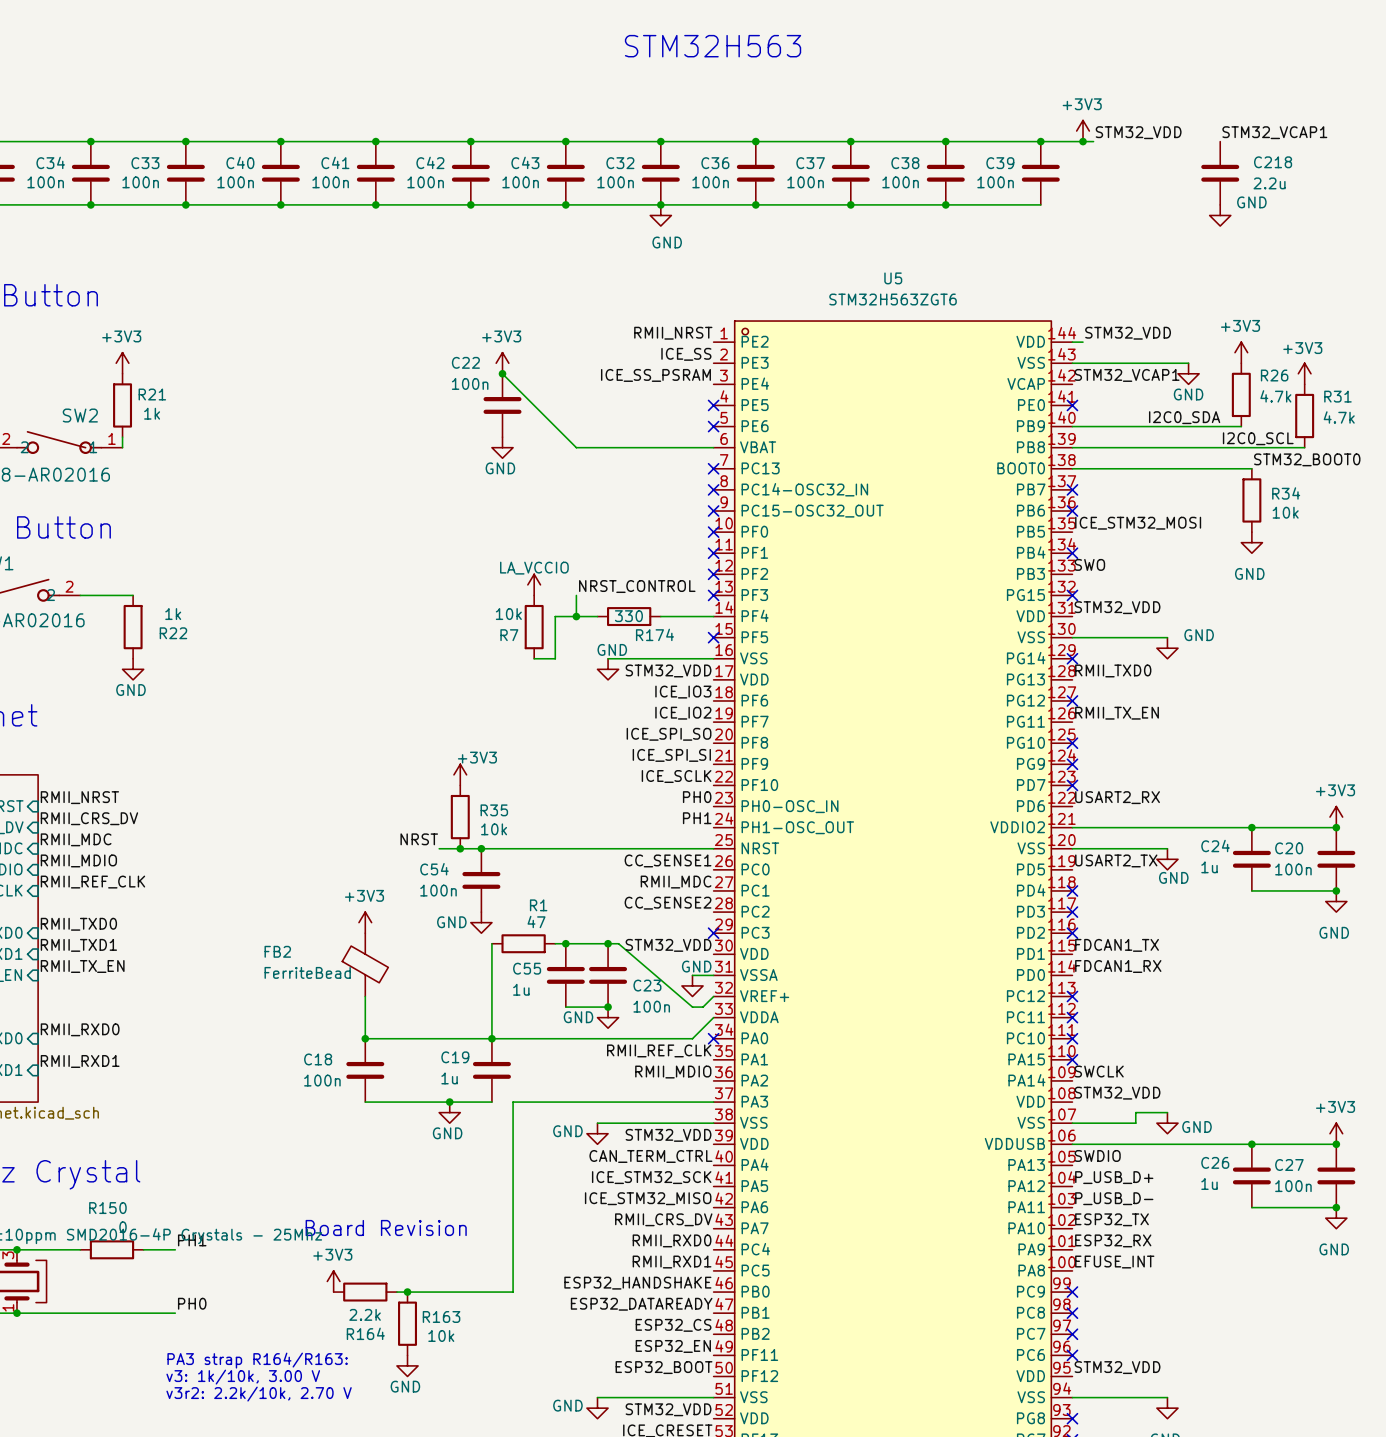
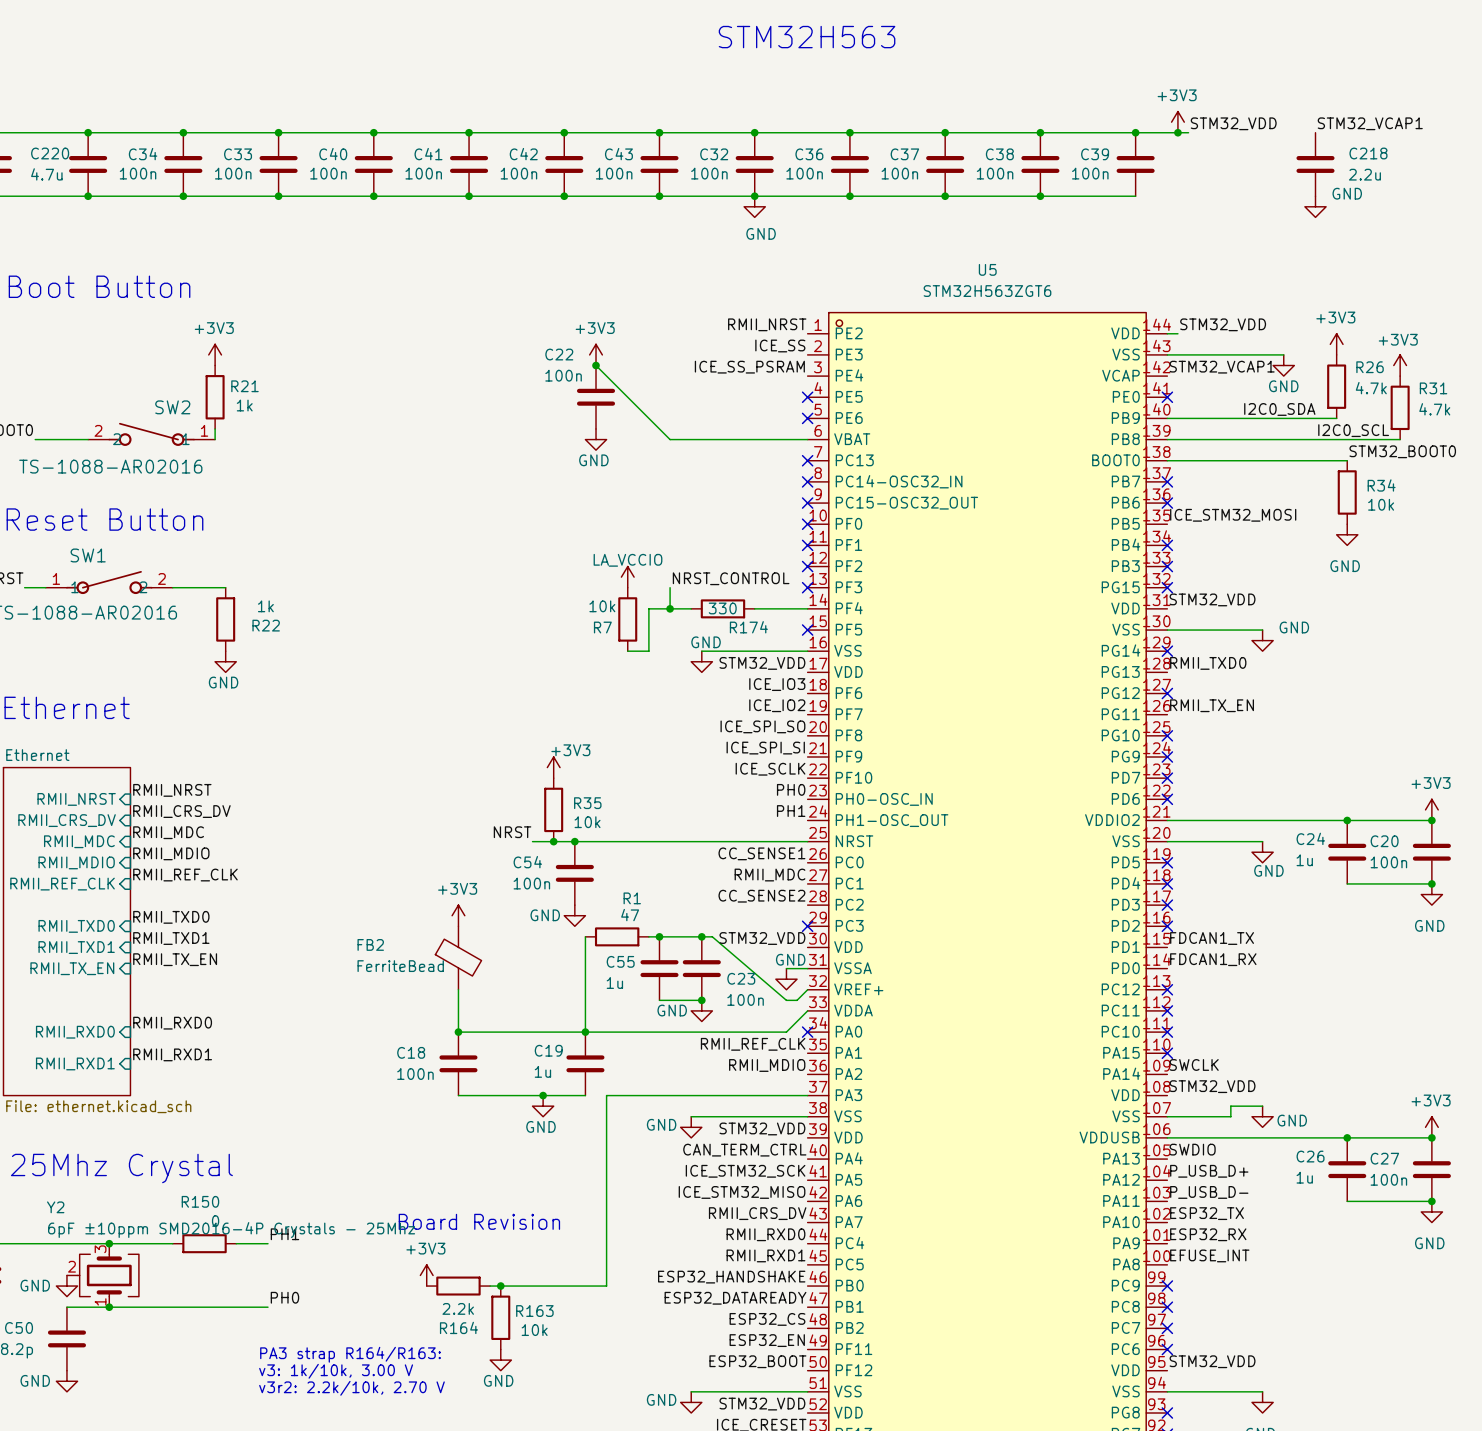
label: SWO (1089, 564) -> none
no-connect mark: none -> (1167, 566)
label: USART2_RX (1117, 797) -> none
no-connect mark: none -> (1167, 799)
label: USART2_TX (1116, 860) -> none
no-connect mark: none -> (1167, 862)

